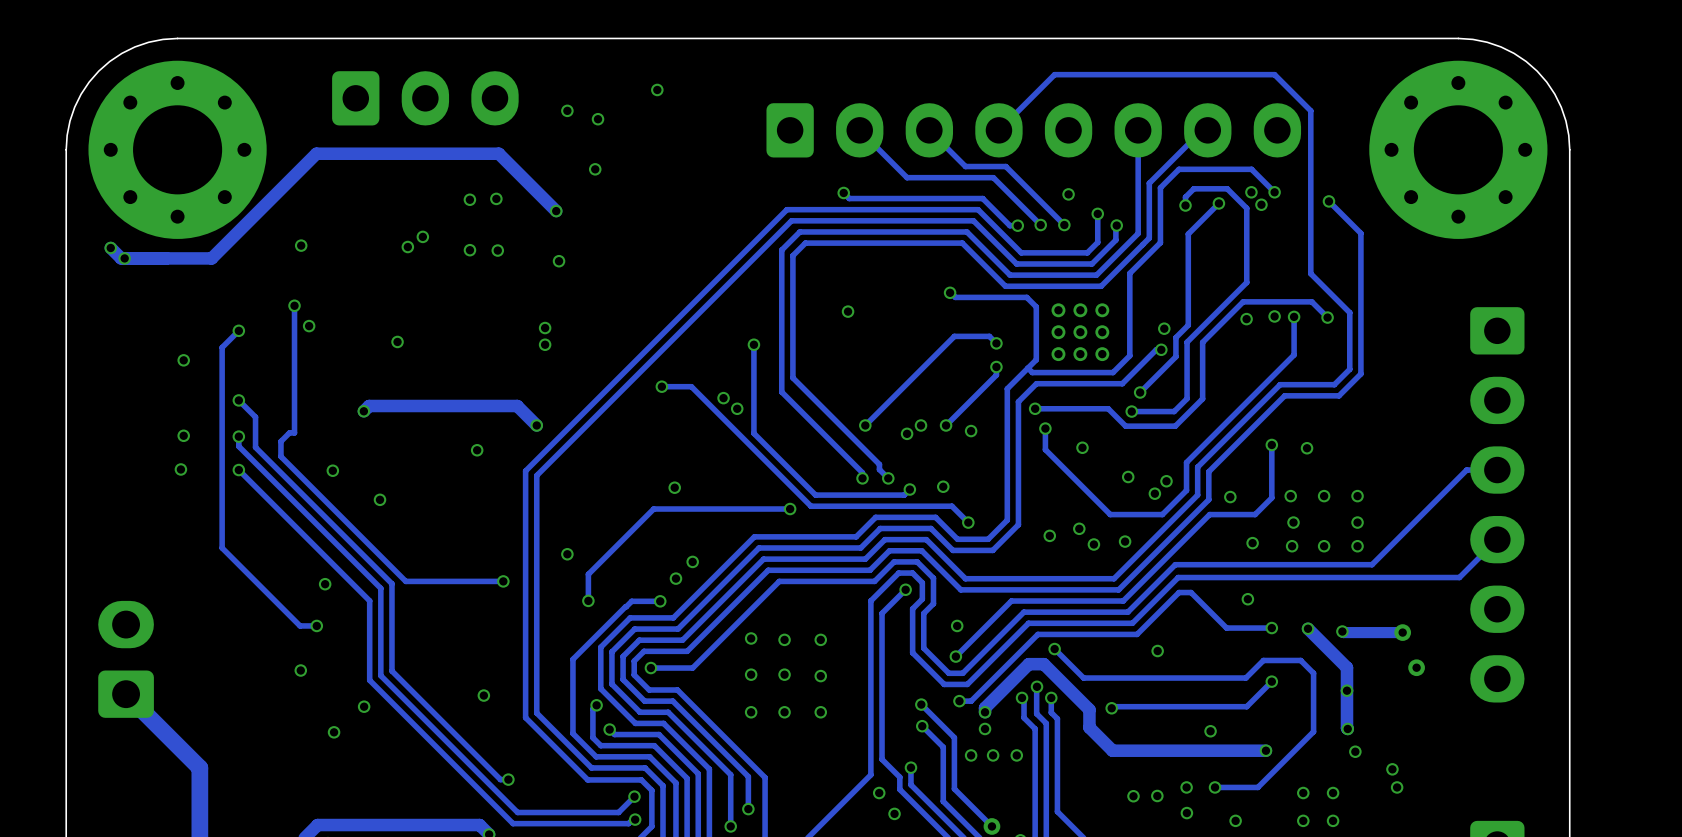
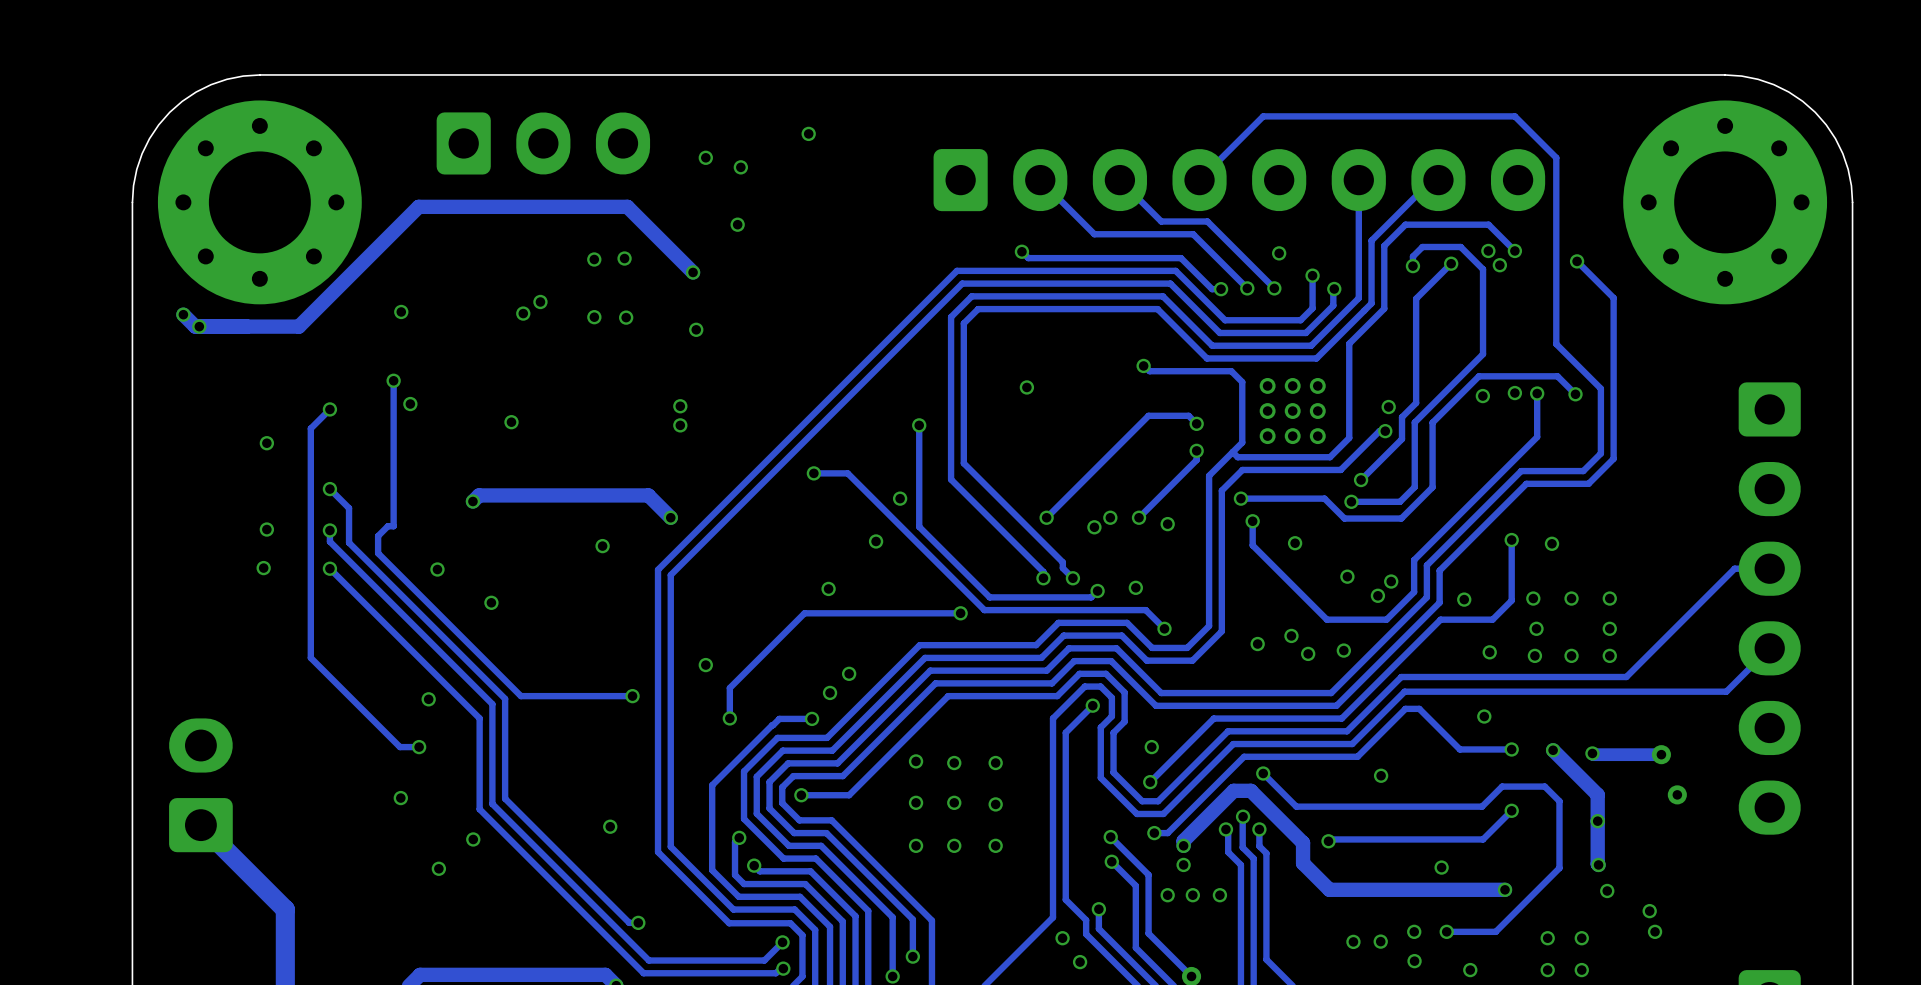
via position: (723, 398) -> (876, 541)

